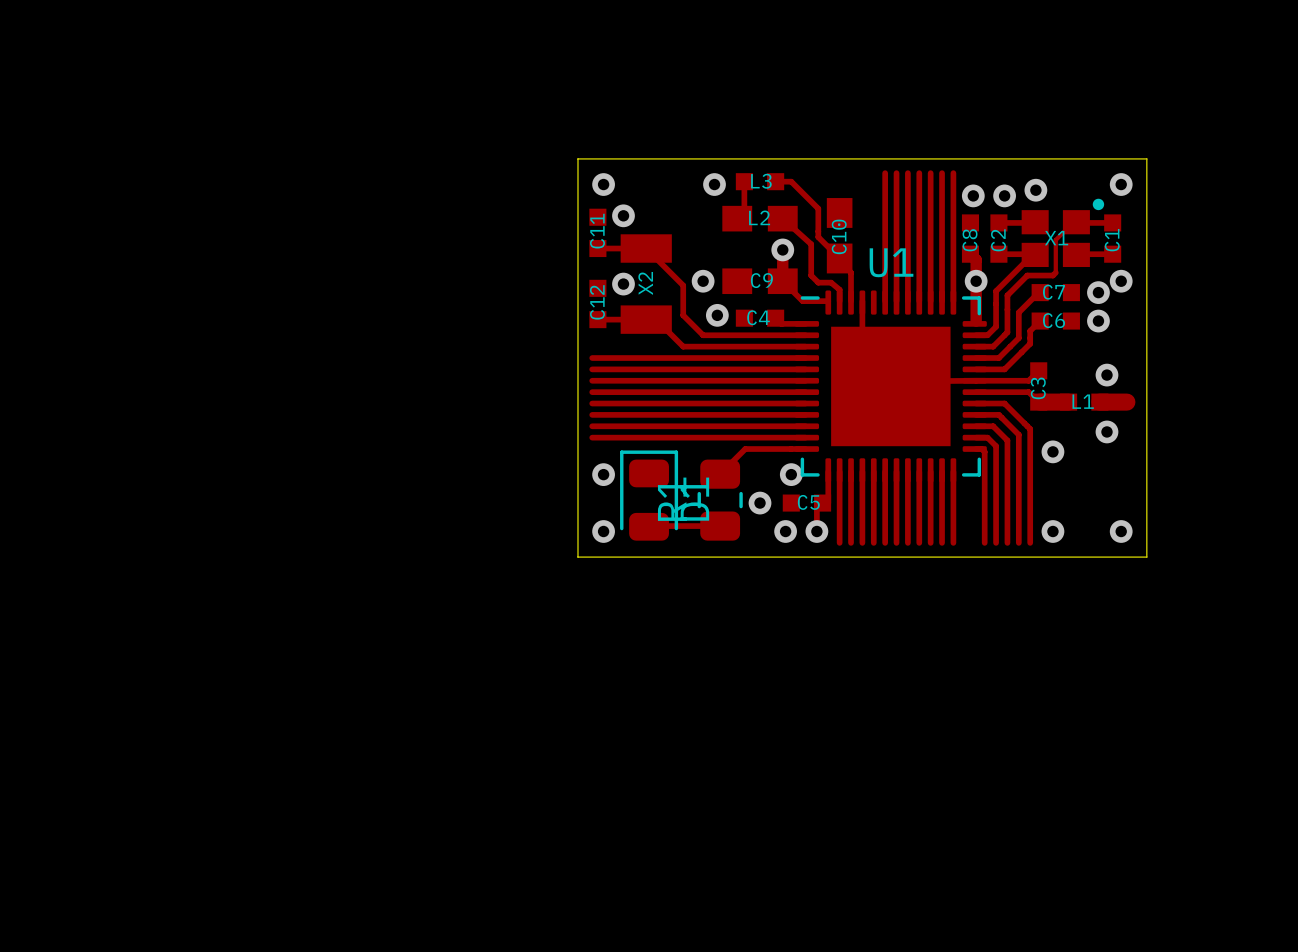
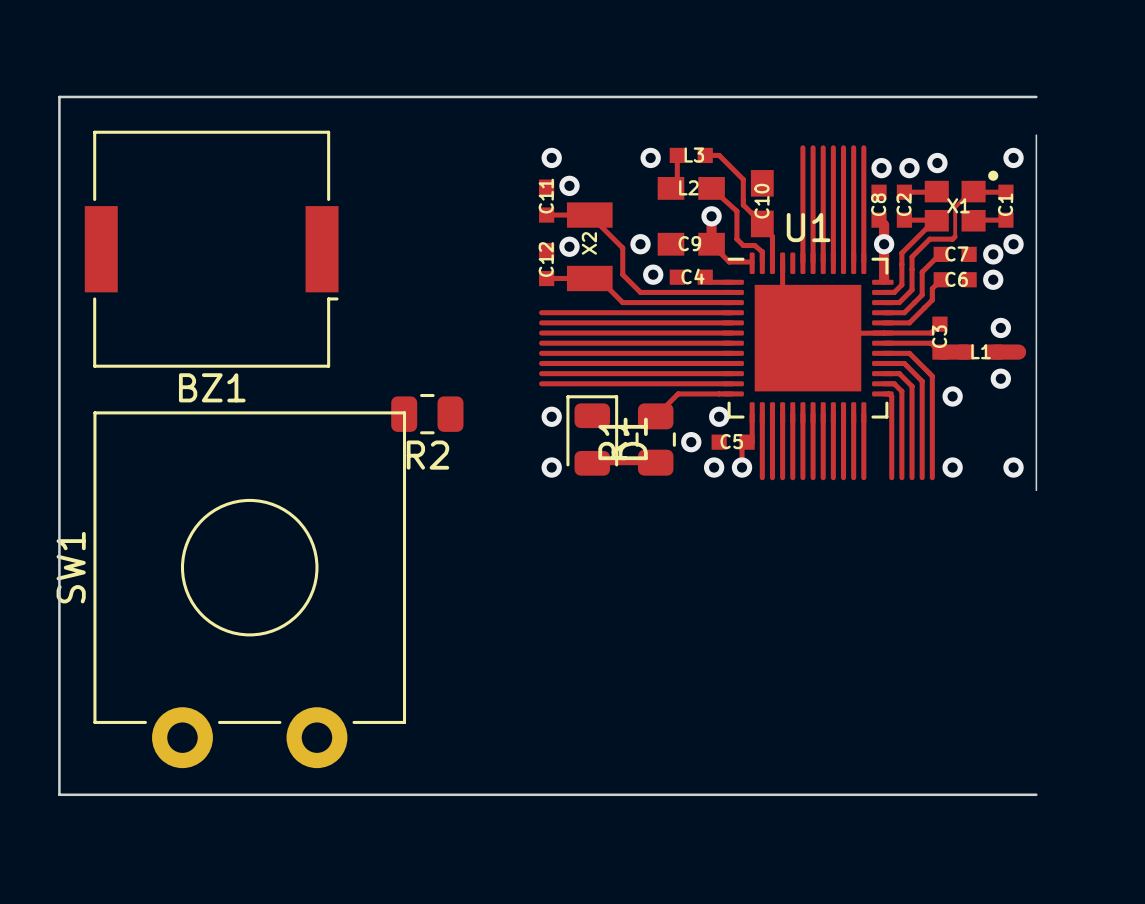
board edge: none -> (1036, 96) (59, 96) (59, 794) (1036, 794)
board edge: (1146, 158) (577, 158) (577, 557) (1146, 557) -> none
BZ1: none -> (211, 249)
R2: none -> (427, 414)
SW1: none -> (249, 589)

